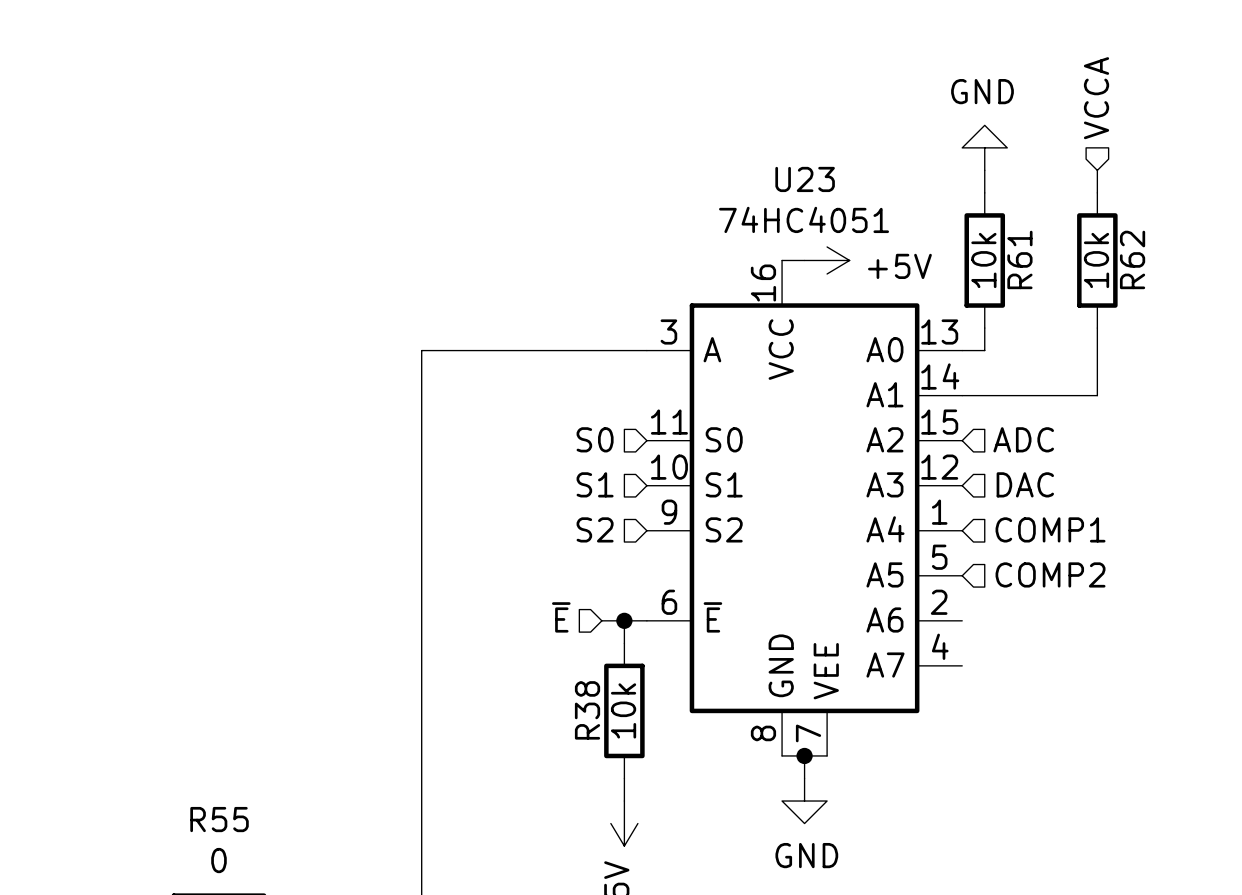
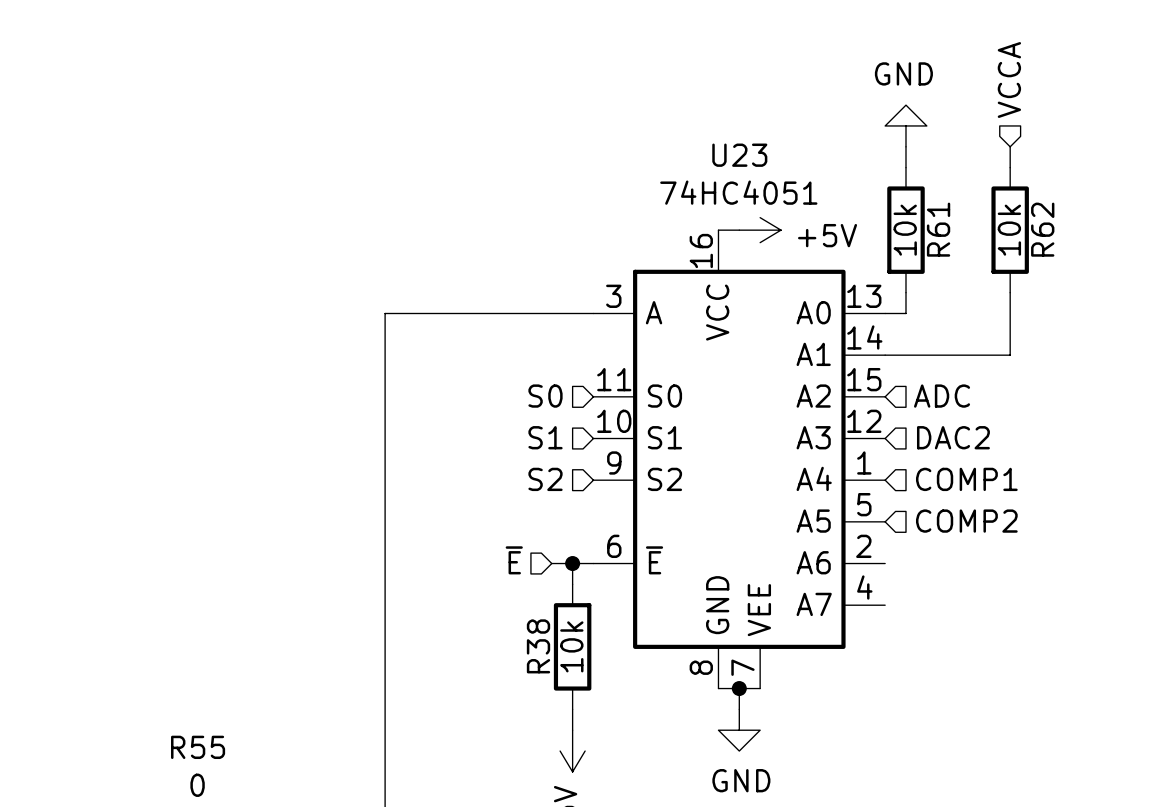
hierarchical label: DAC (1025, 484) -> DAC2 (953, 437)

